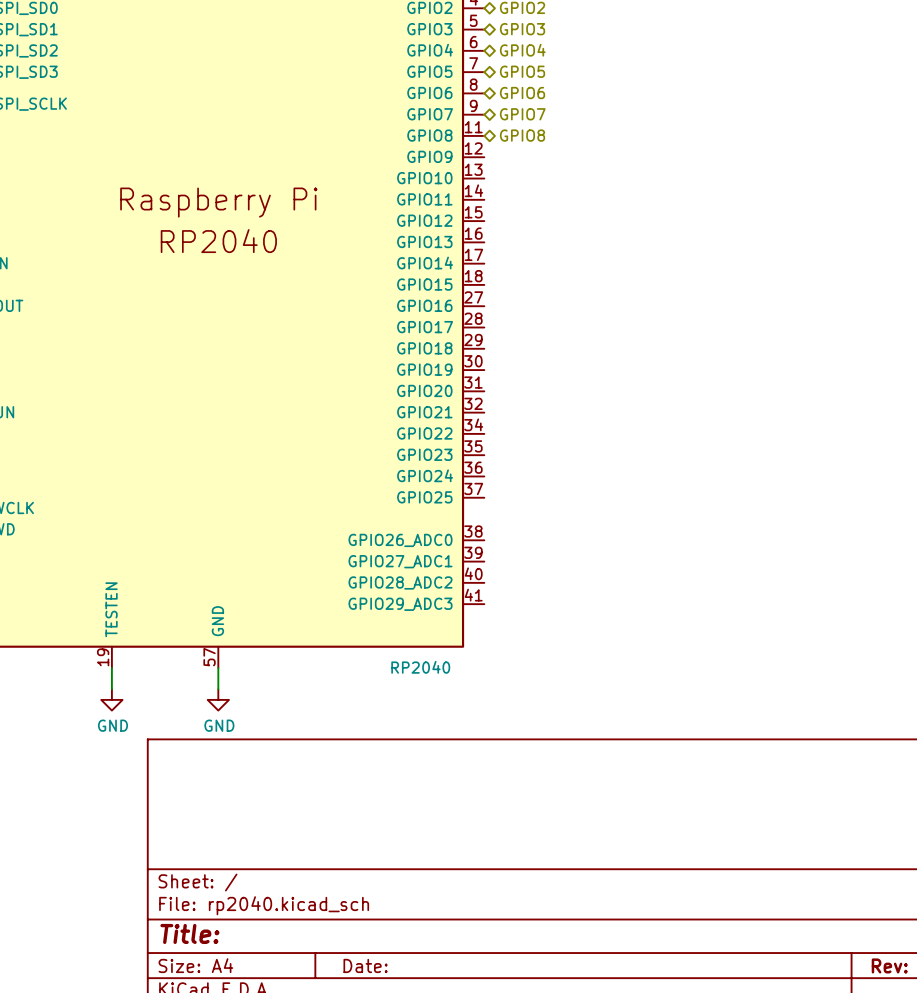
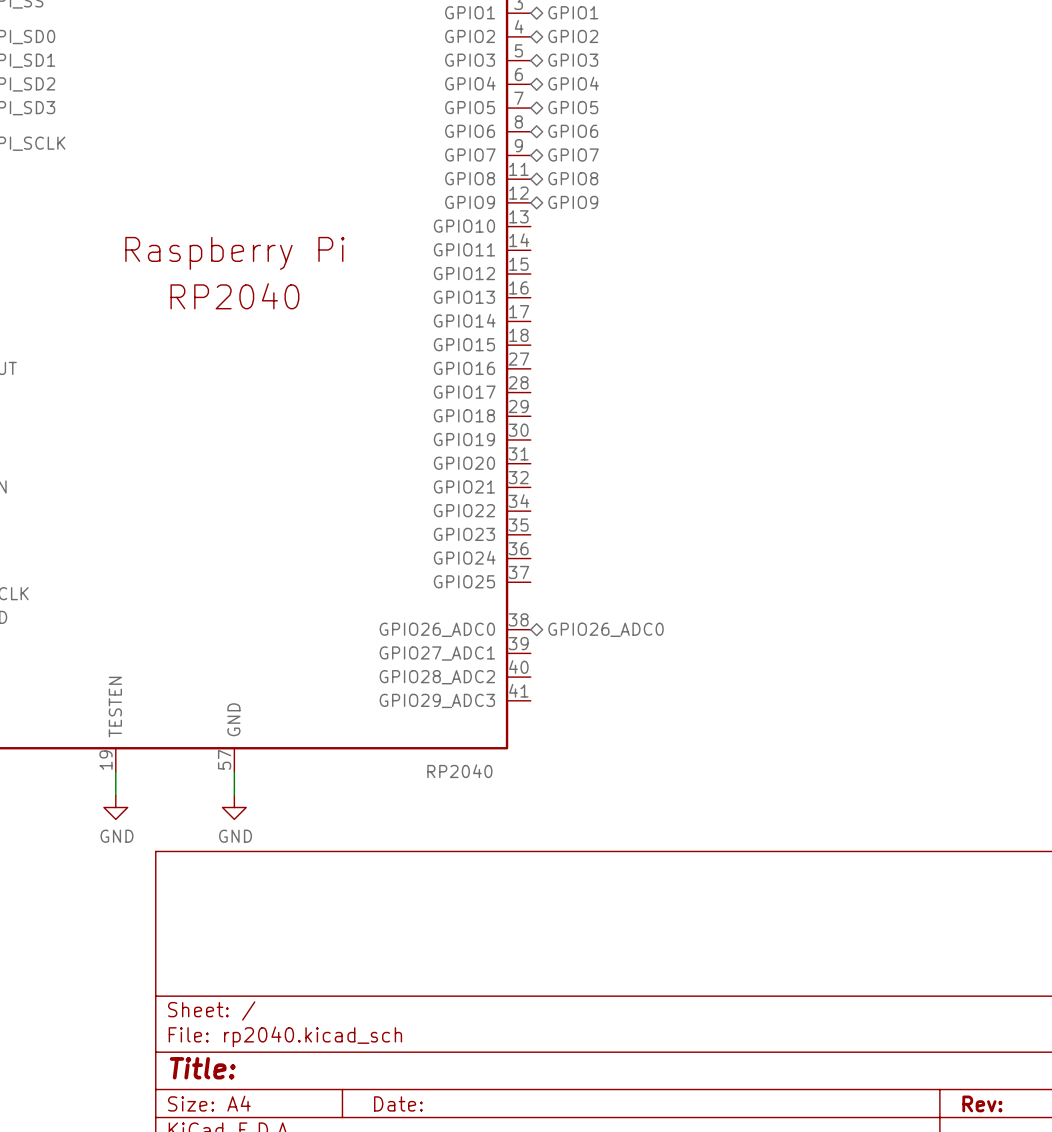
hierarchical label: none -> GPIO9 (573, 202)
hierarchical label: none -> GPIO26_ADC0 (606, 629)

